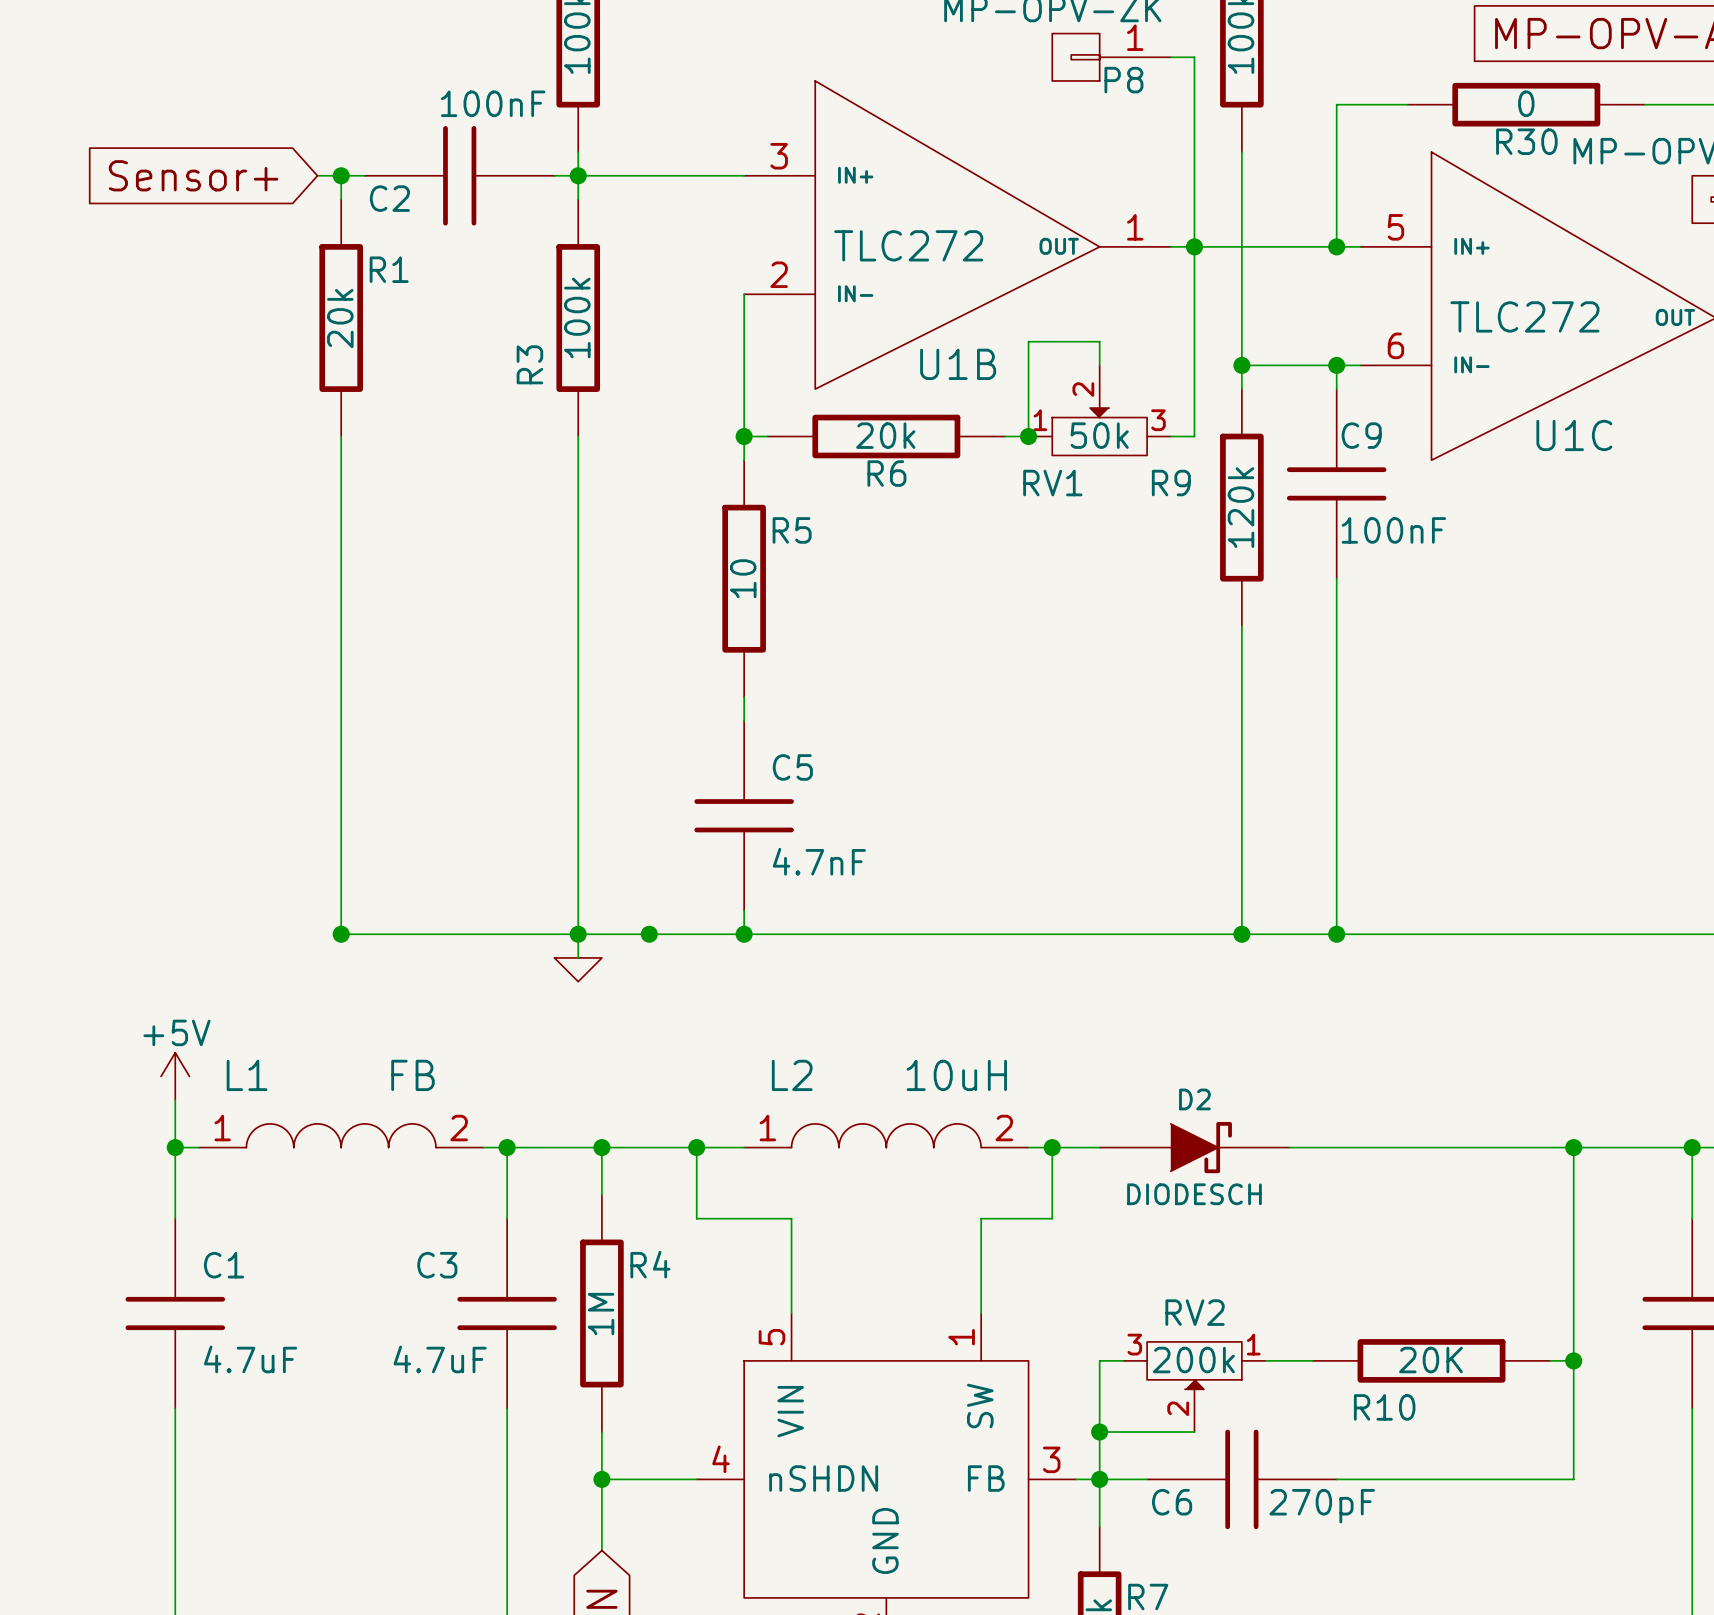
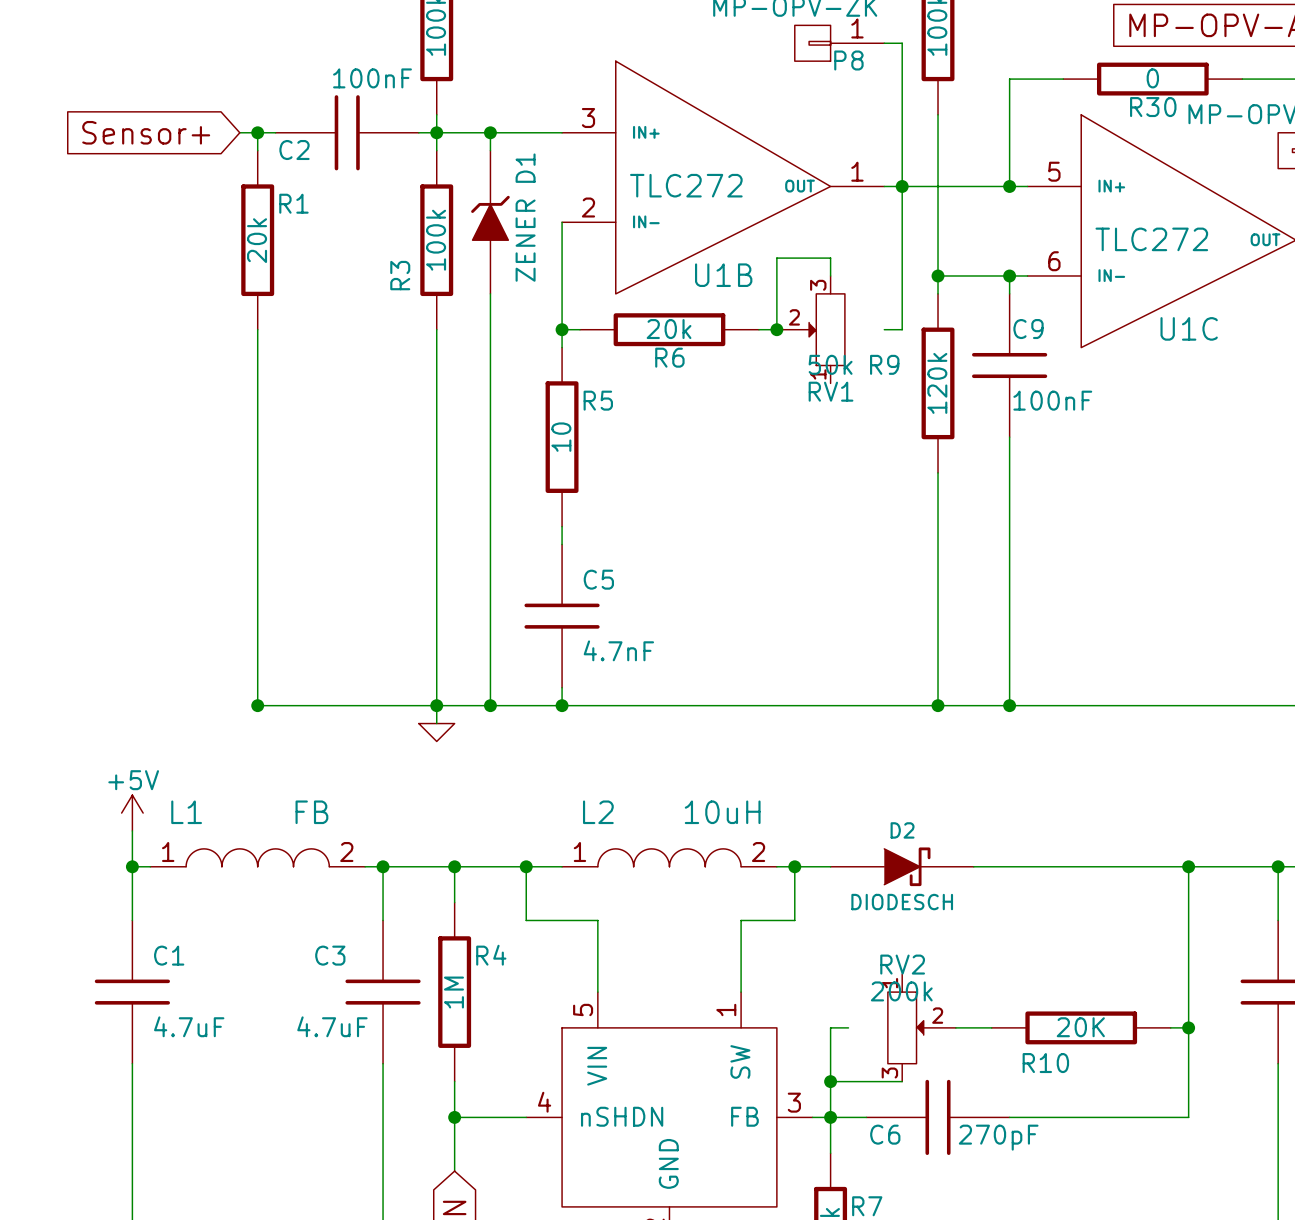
wire: none -> (490, 132) (490, 150)
junction: none -> (490, 132)
D1: none -> ZENER (490, 222)
wire: none -> (490, 293) (490, 705)
RV1 rotation: 0° (1099, 431) -> 90° counterclockwise (827, 329)
RV1 name position: RV1 (1052, 483) -> RV1 (831, 391)
RV2 rotation: 0° (1194, 1365) -> 90° counterclockwise (905, 1027)

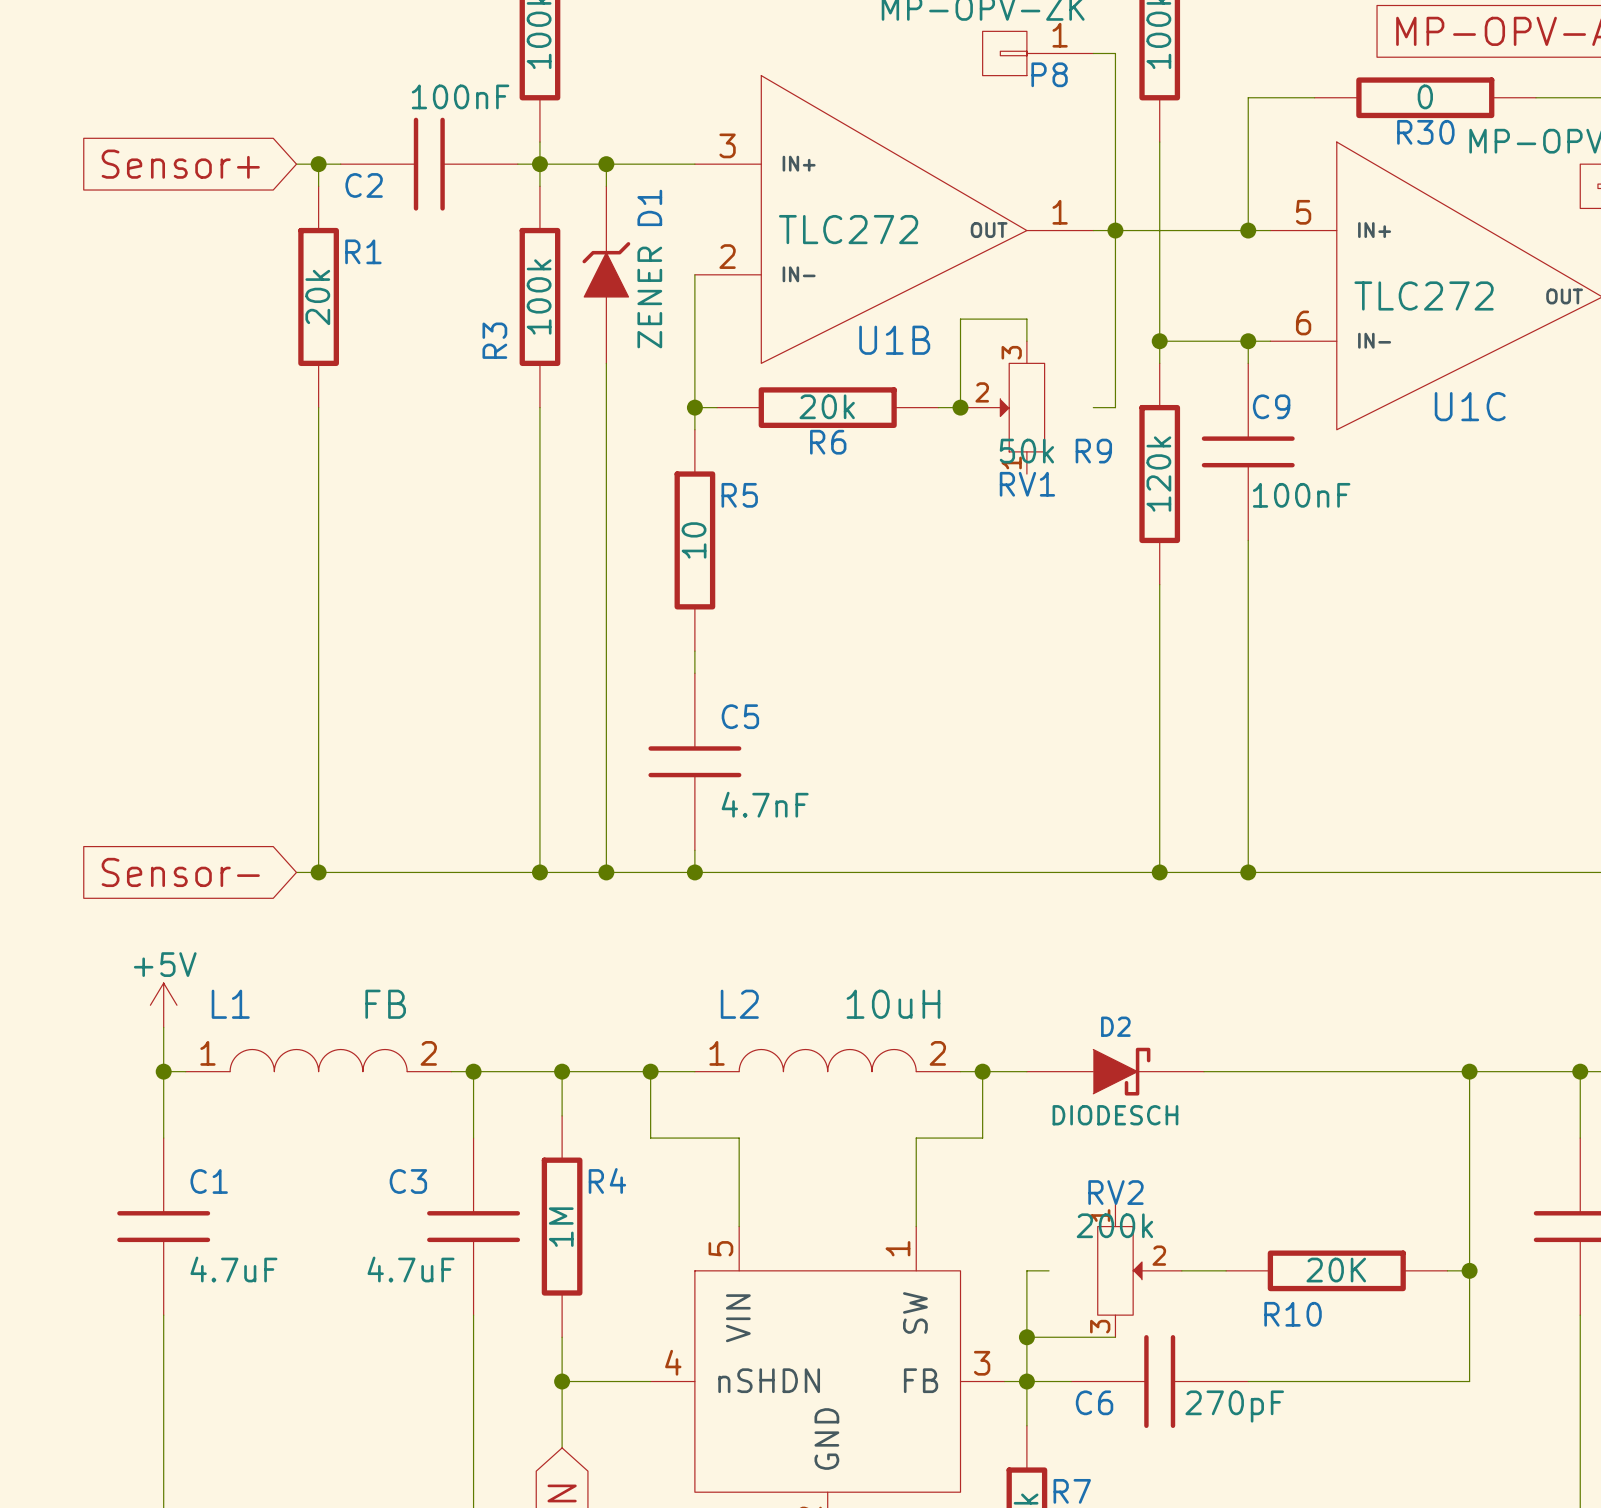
global label: none -> Sensor- (180, 872)
wire: none -> (296, 872) (318, 872)
wire: (436, 705) (436, 723) -> none
power symbol: (436, 732) -> none

